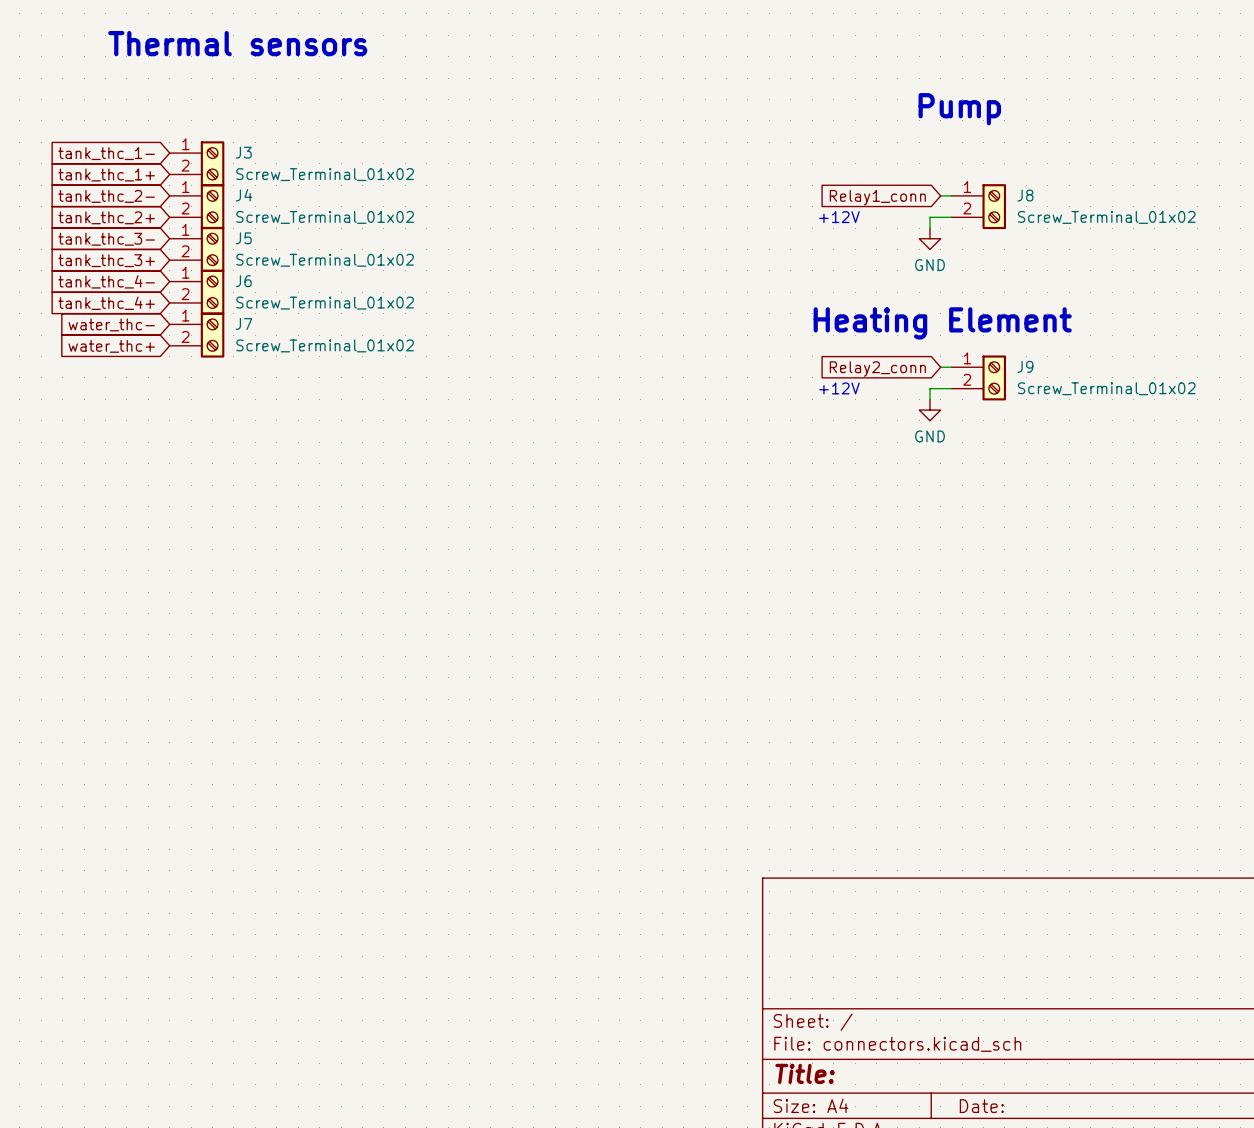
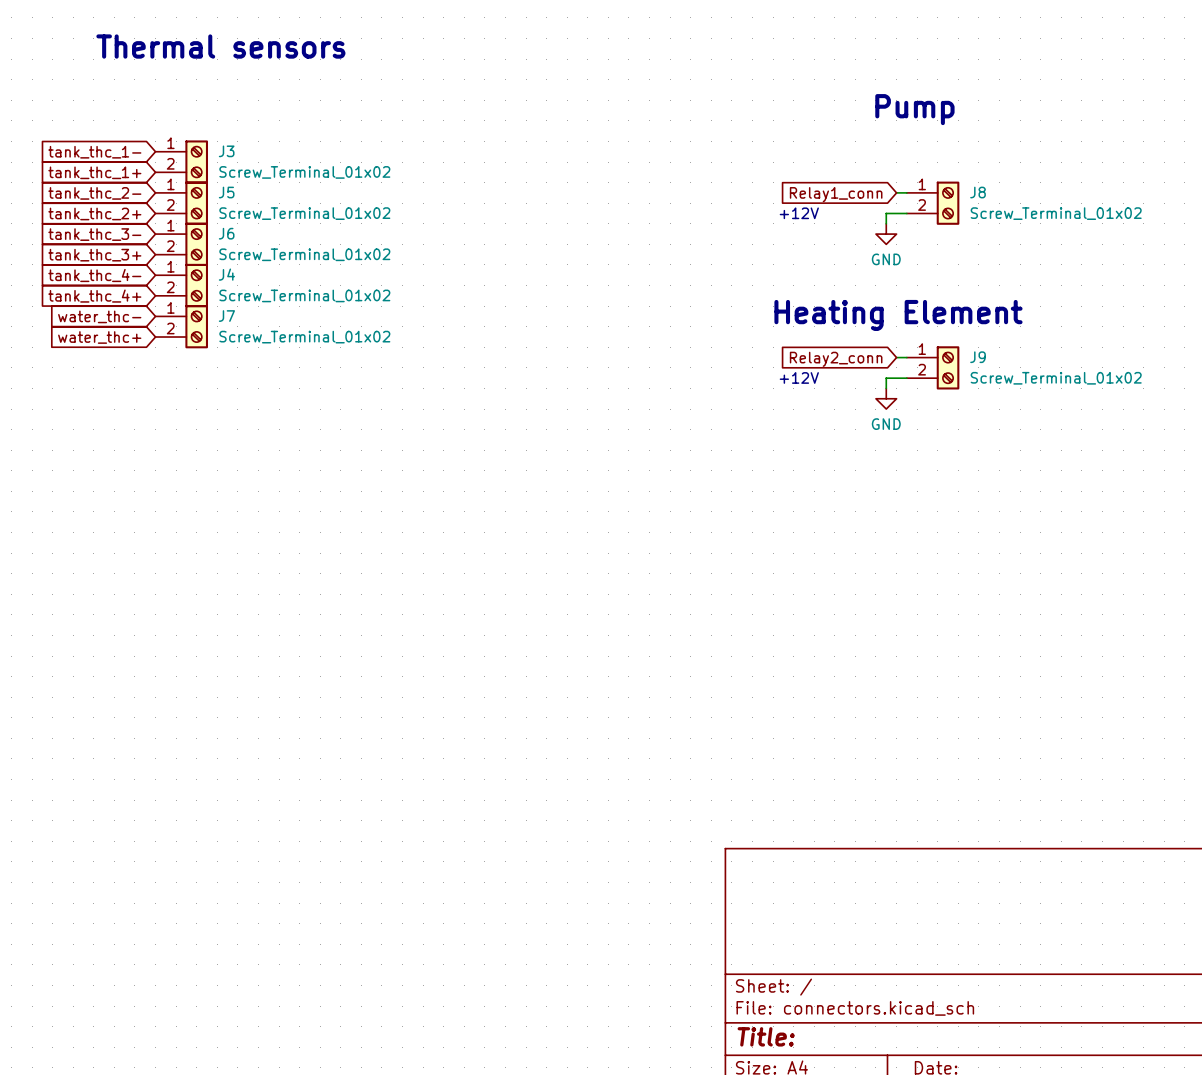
J4 name: J4 (244, 195) -> J5 (226, 192)
J5 name: J5 (243, 238) -> J6 (226, 233)
J6 name: J6 (243, 281) -> J4 (226, 274)

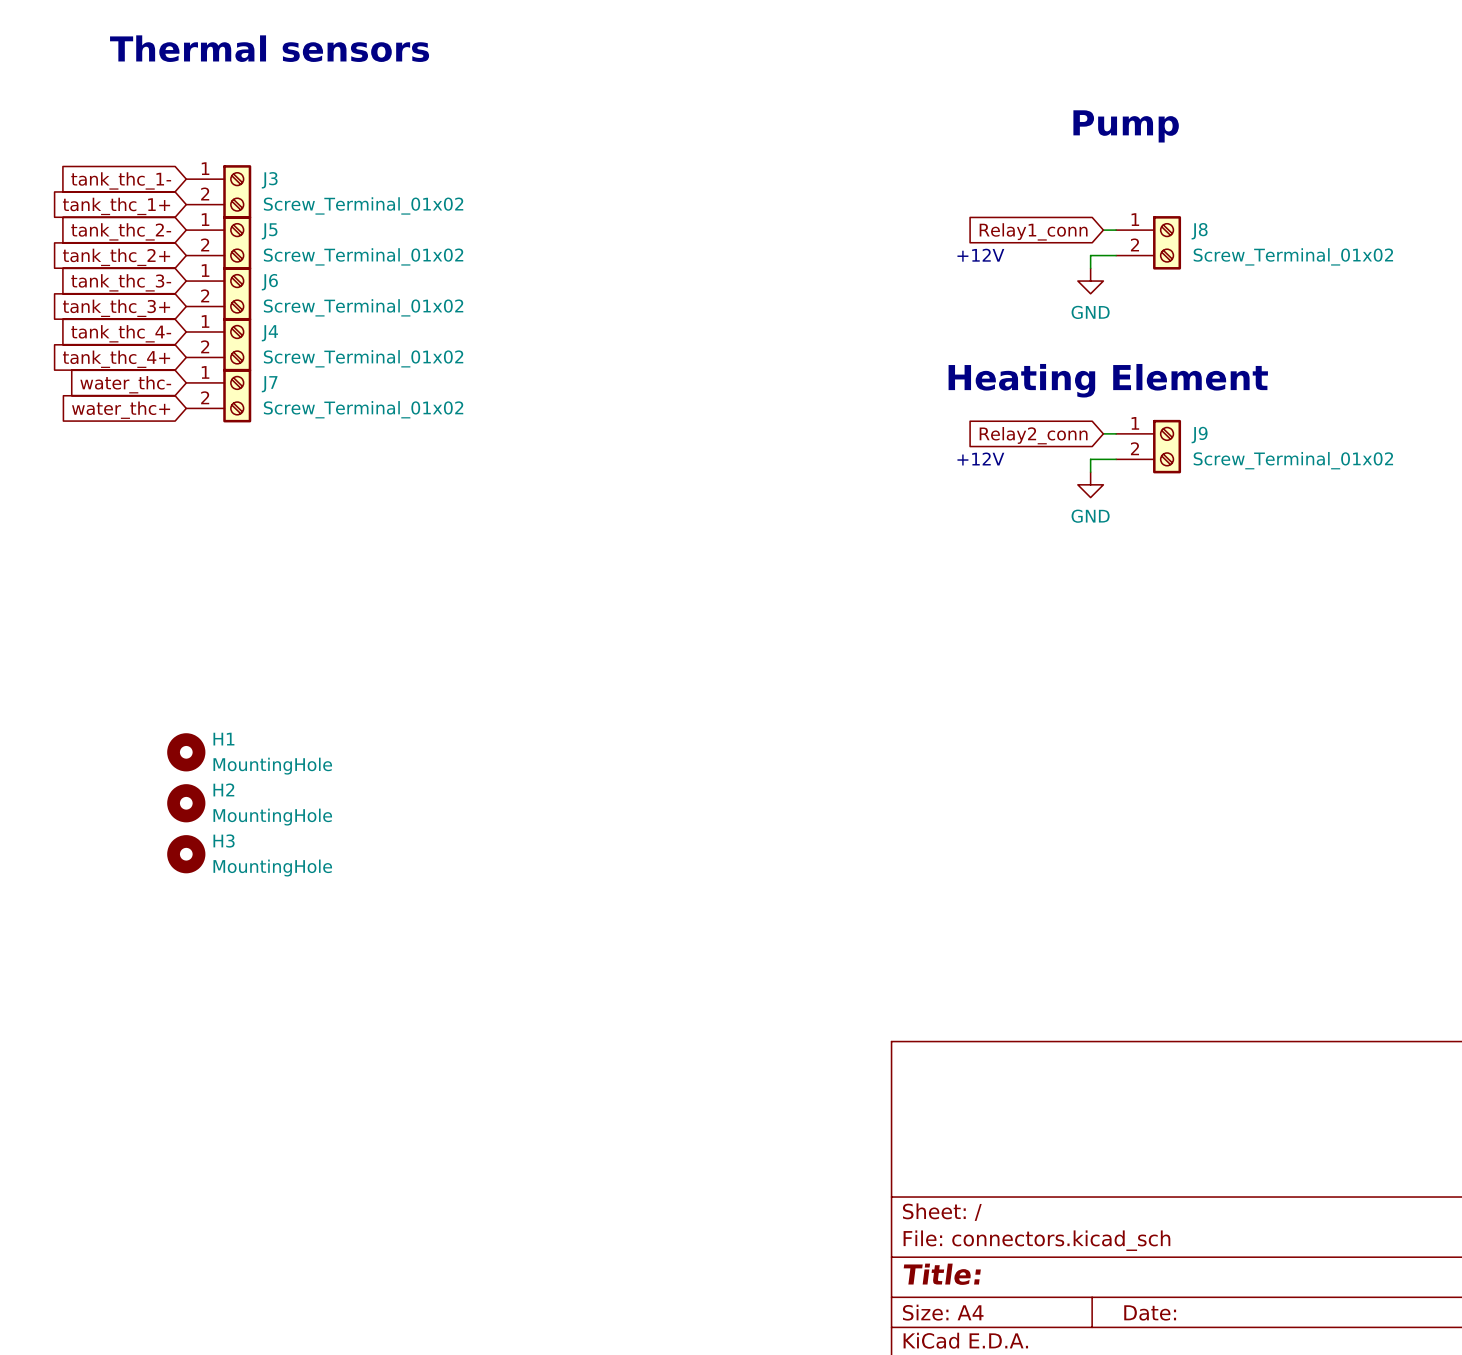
H1: none -> MountingHole (186, 752)
H2: none -> MountingHole (186, 803)
H3: none -> MountingHole (186, 854)

